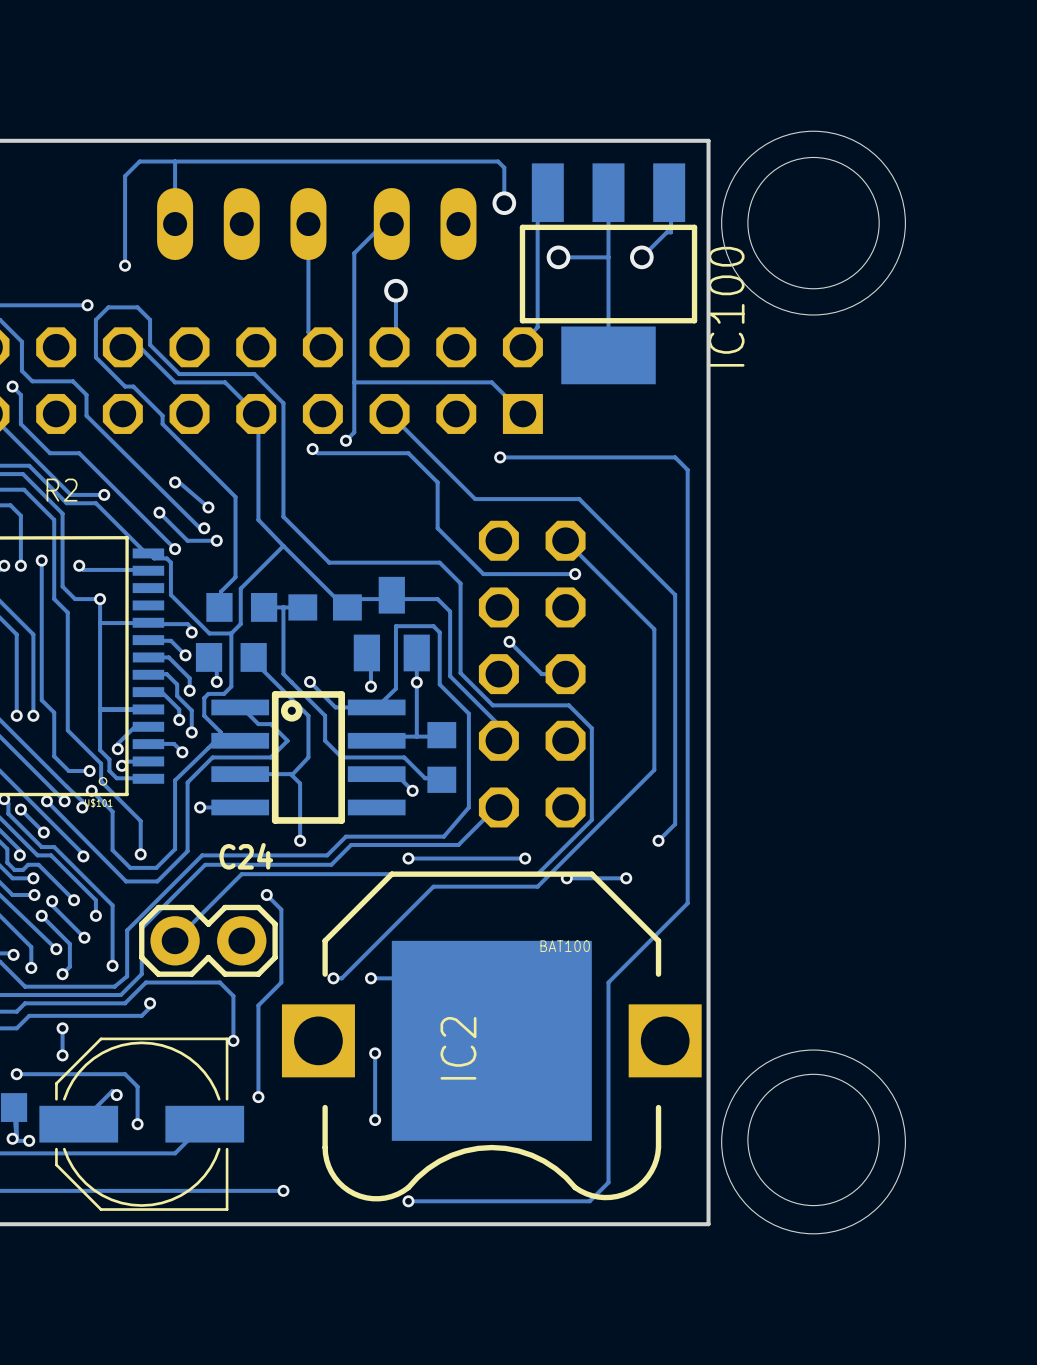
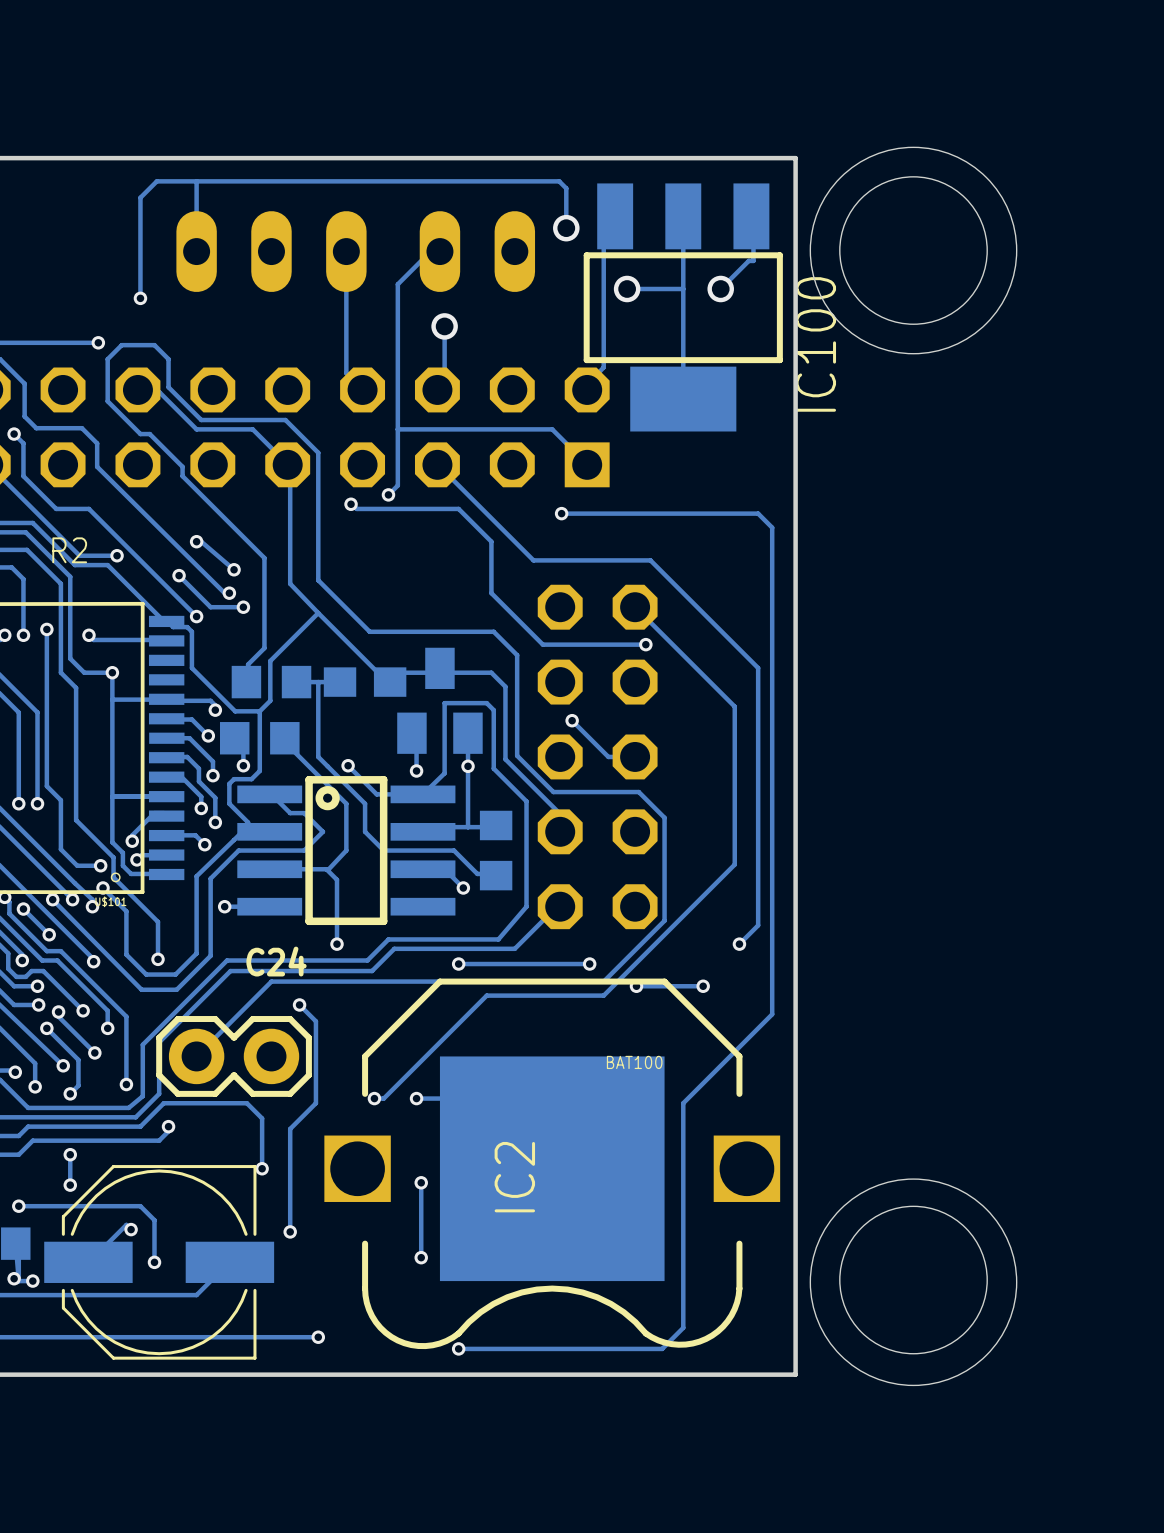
BAT100 footprint: [281, 871, 702, 1202] -> [324, 978, 781, 1350]

